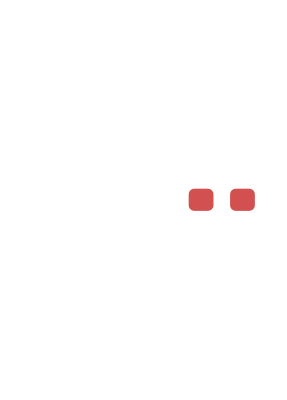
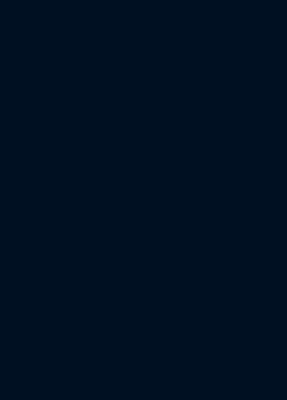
part: (221, 199) -> none

